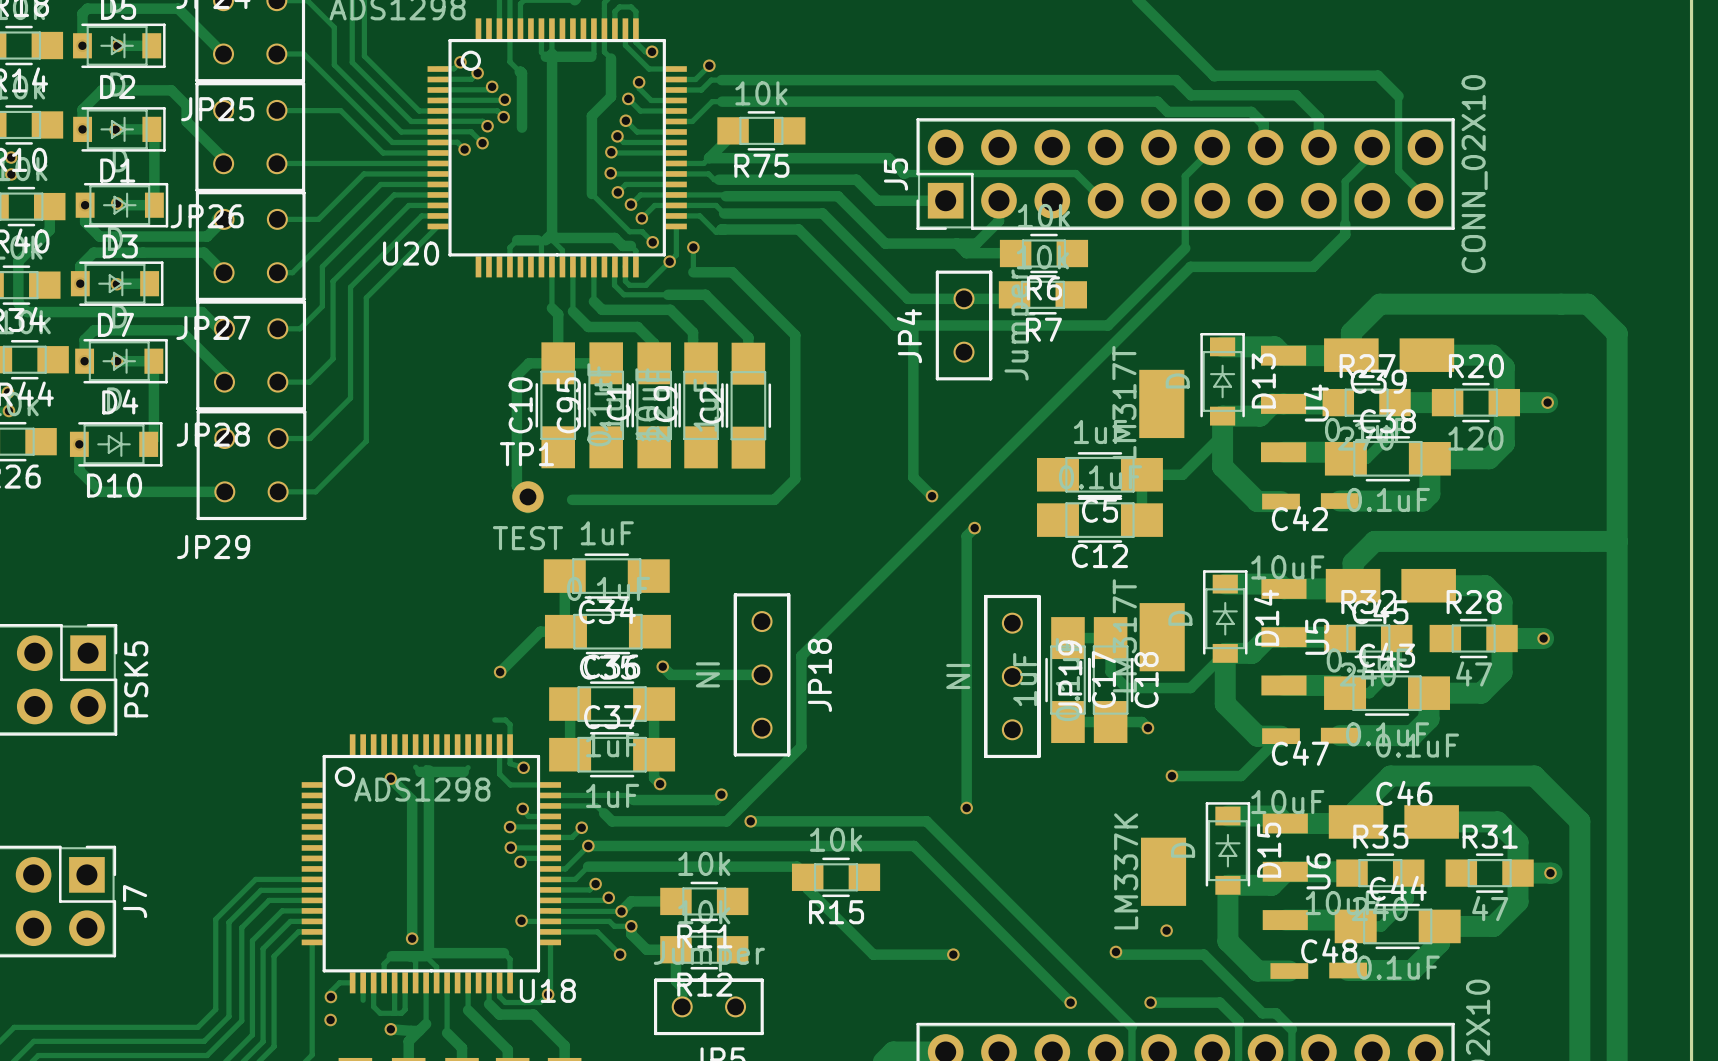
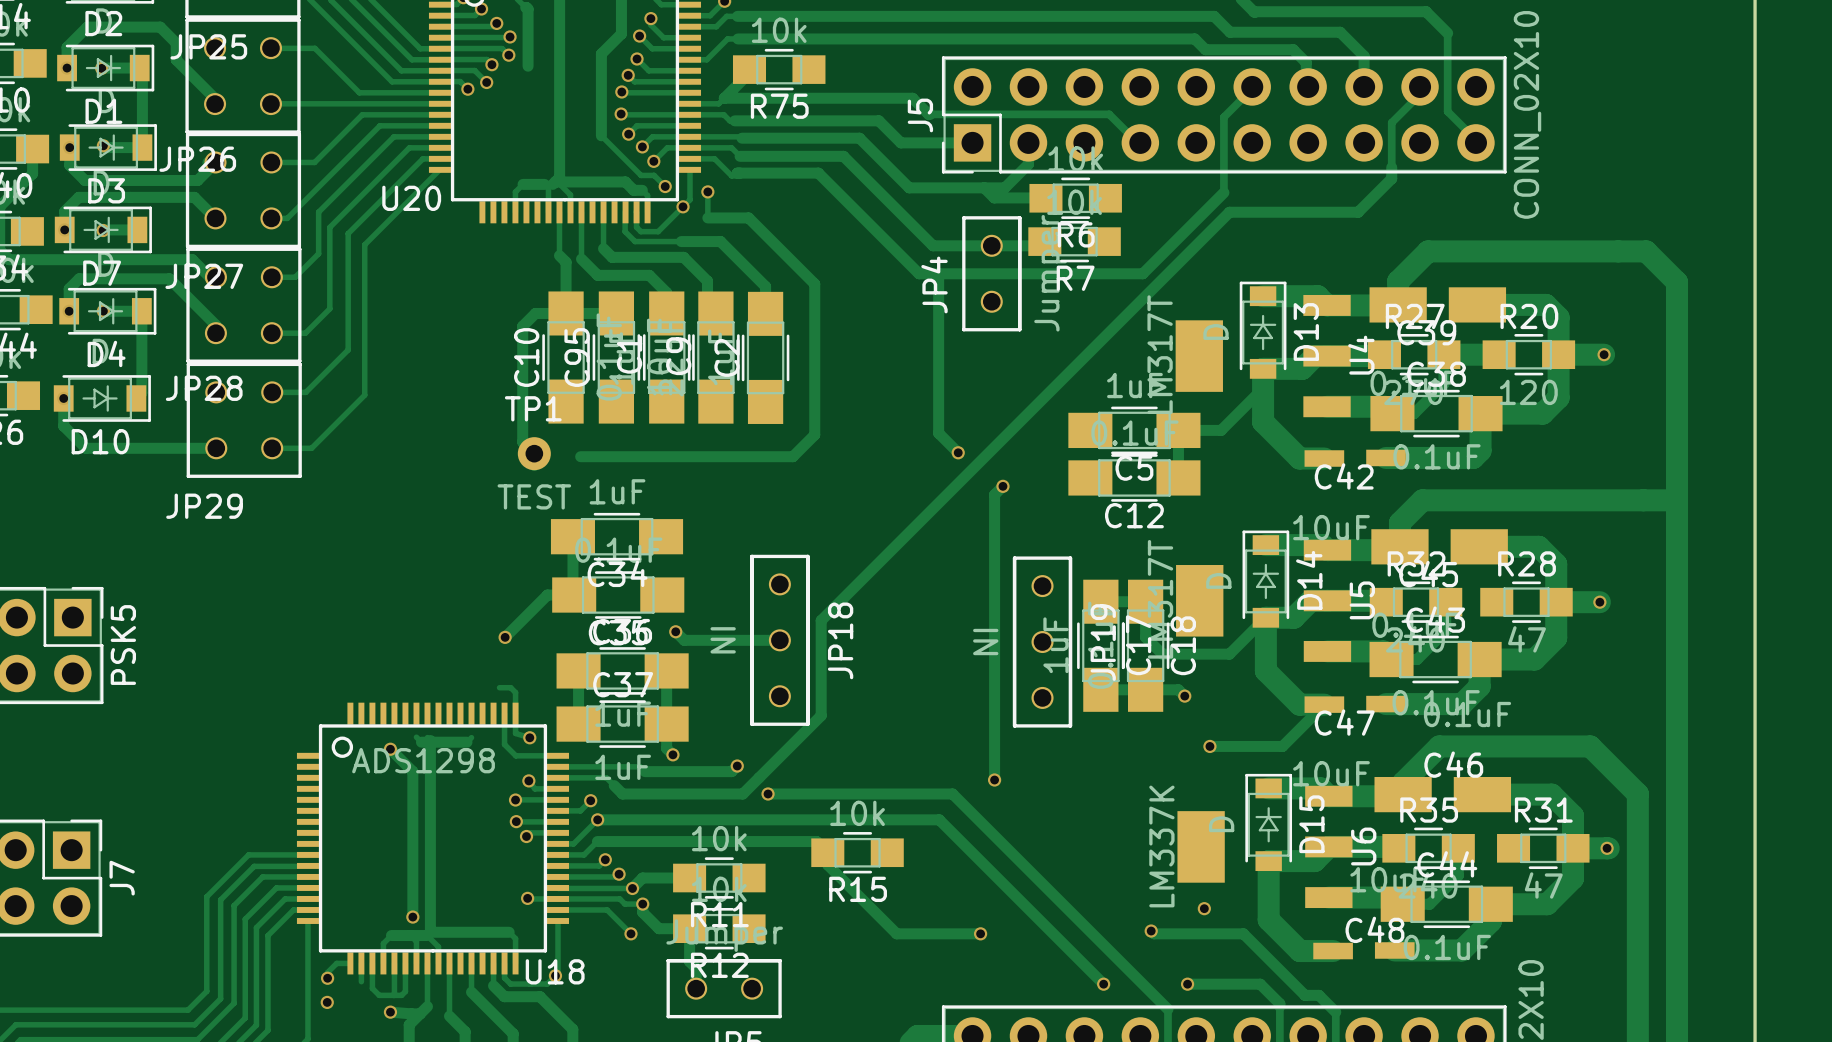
track: (318, 110) (340, 110) (383, 152) -> (314, 48) (359, 92) (382, 92)

